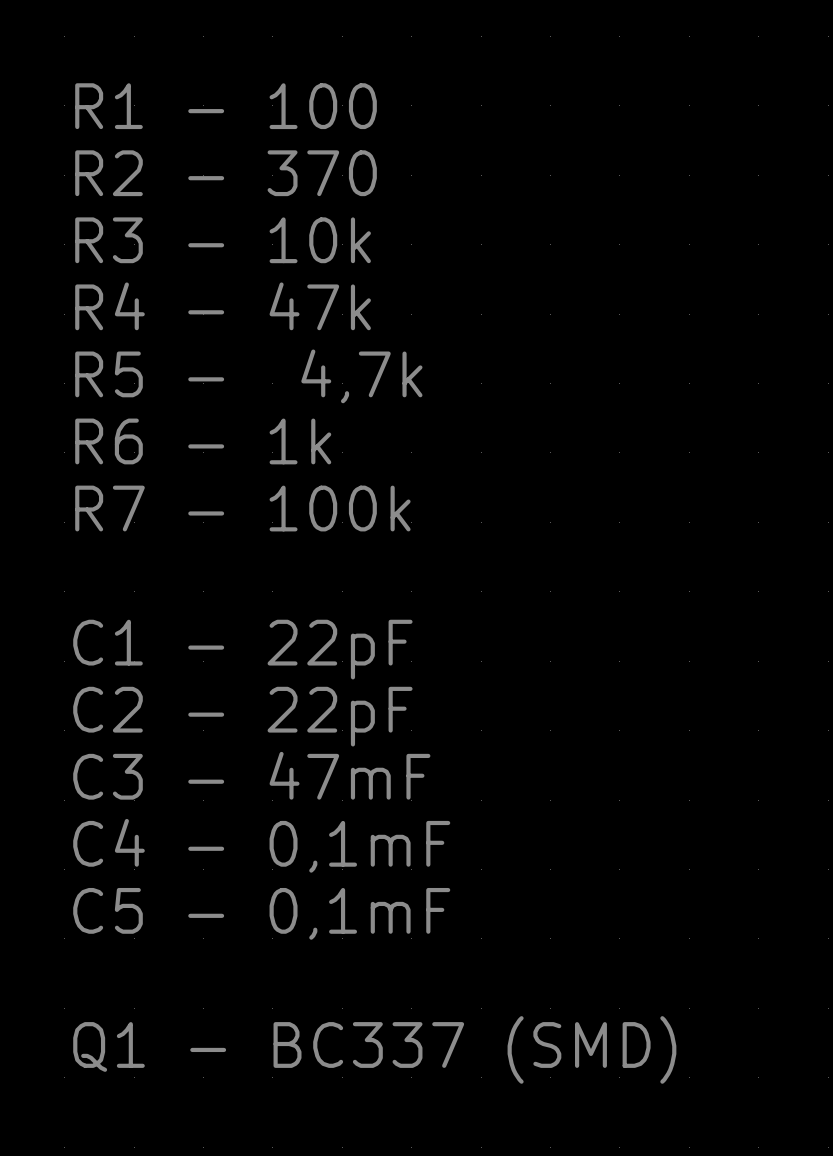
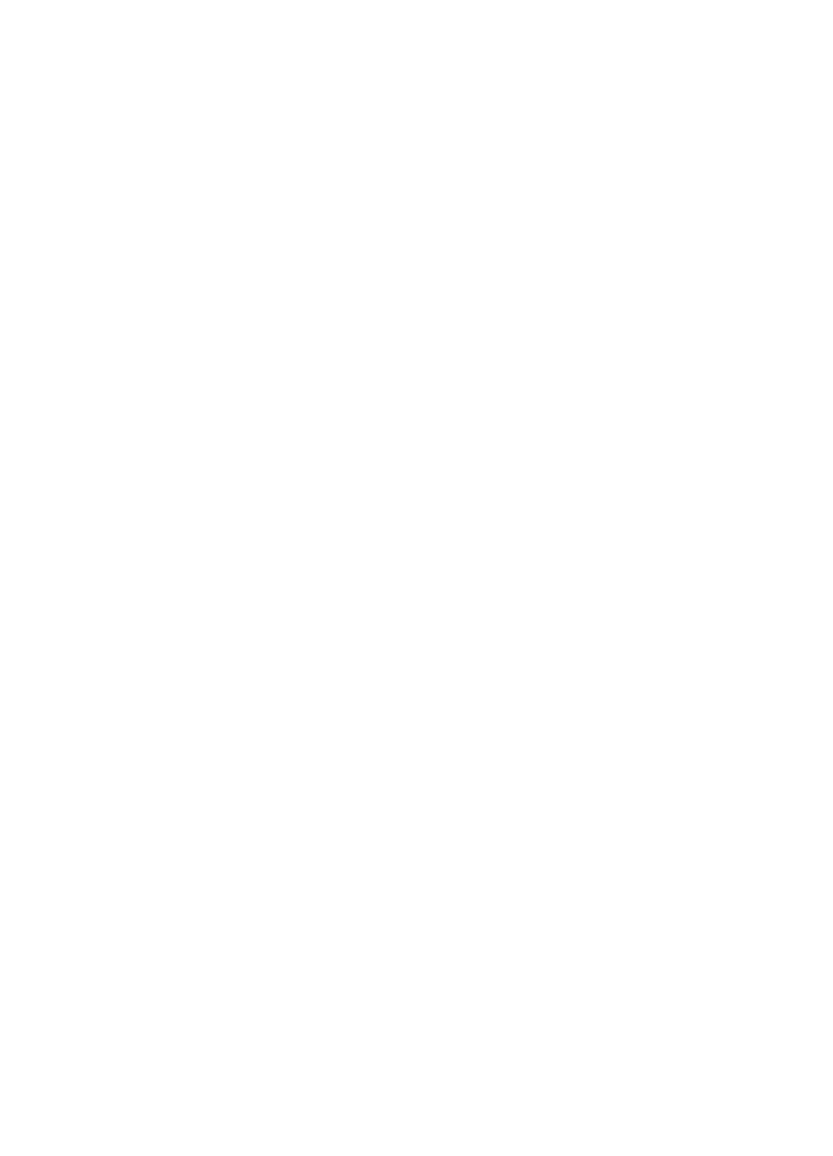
text: R1 - 100 (226, 106) -> none
text: R2 - 370 (226, 173) -> none
text: R3 - 10k (223, 240) -> none
text: R4 - 47k (223, 306) -> none
text: R5 - 4,7k (248, 376) -> none
text: R6 - 1k (203, 441) -> none
text: R7 - 100k (242, 508) -> none
text: C1 - 22pF (242, 649) -> none
text: C2 - 22pF (242, 716) -> none
text: C3 - 47mF (251, 775) -> none
text: C4 - 0,1mF (261, 845) -> none
text: C5 - 0,1mF (261, 913) -> none
text: Q1 - BC337 (SMD) (374, 1049) -> none

